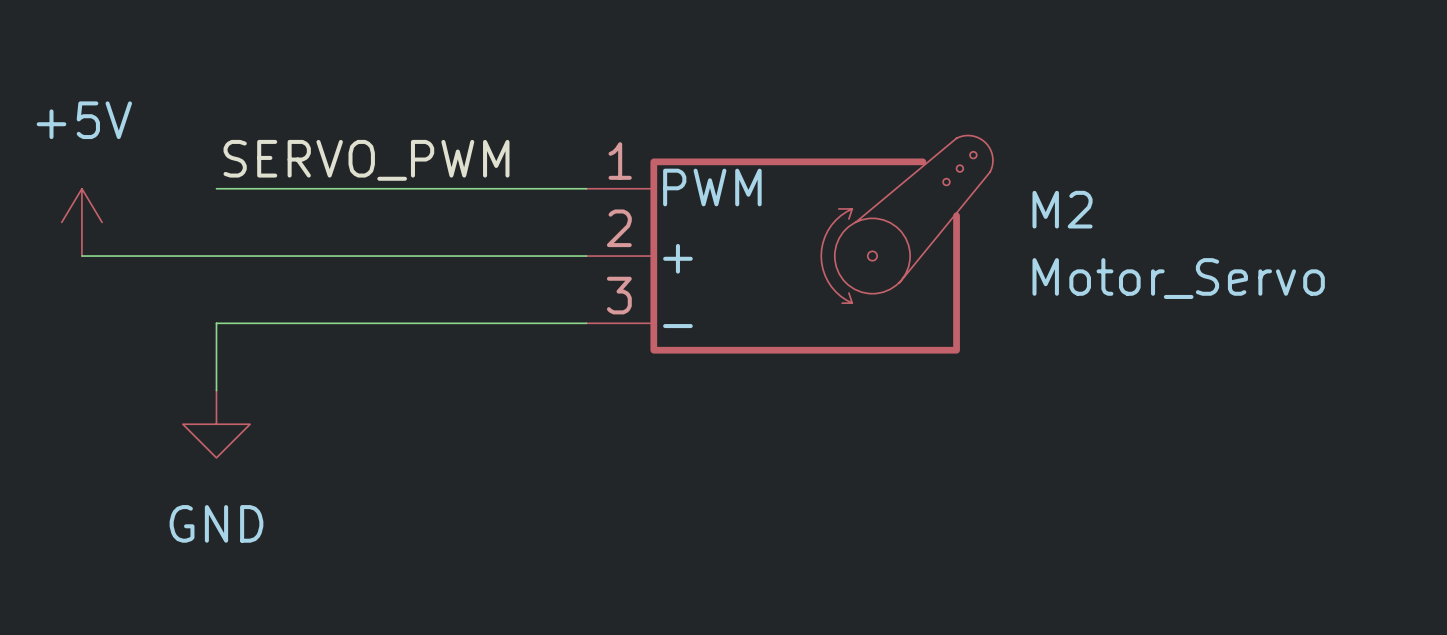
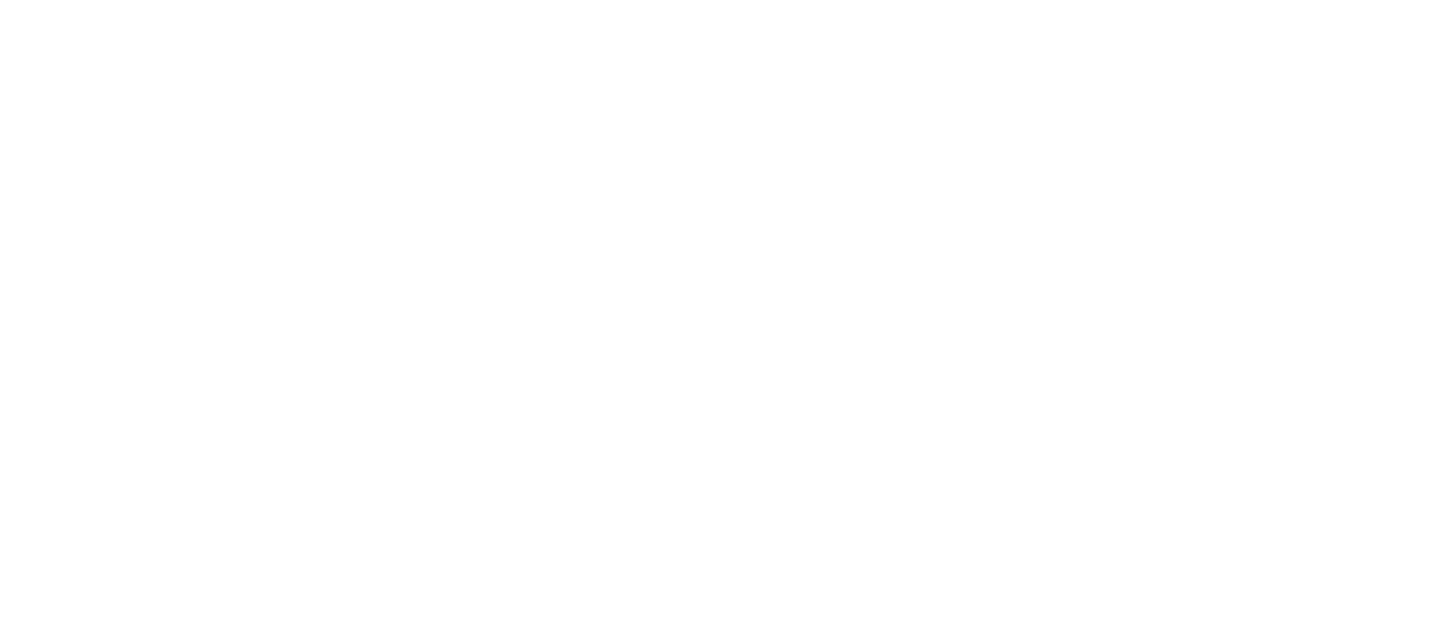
label: SERVO_PWM (366, 160) -> none
wire: (216, 188) (586, 188) -> none
power symbol: +5V (81, 222) -> none
M2: Motor_Servo (789, 244) -> none
wire: (81, 256) (586, 256) -> none
wire: (586, 323) (216, 323) (216, 390) -> none
power symbol: GND (216, 424) -> none

